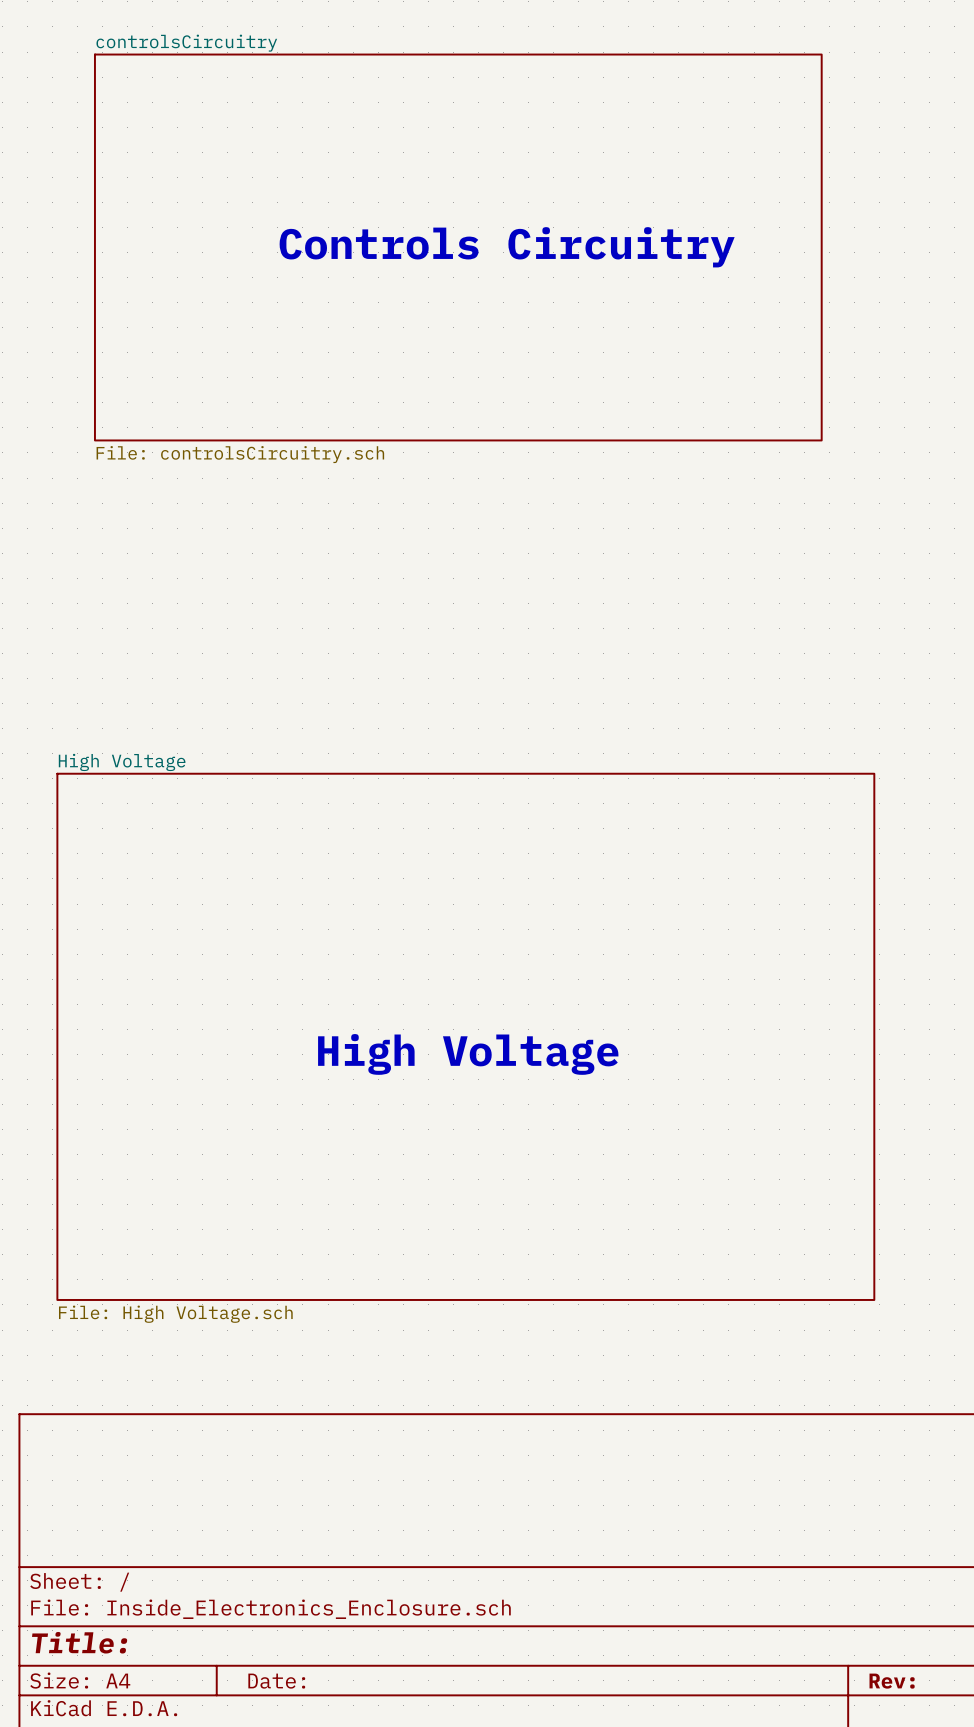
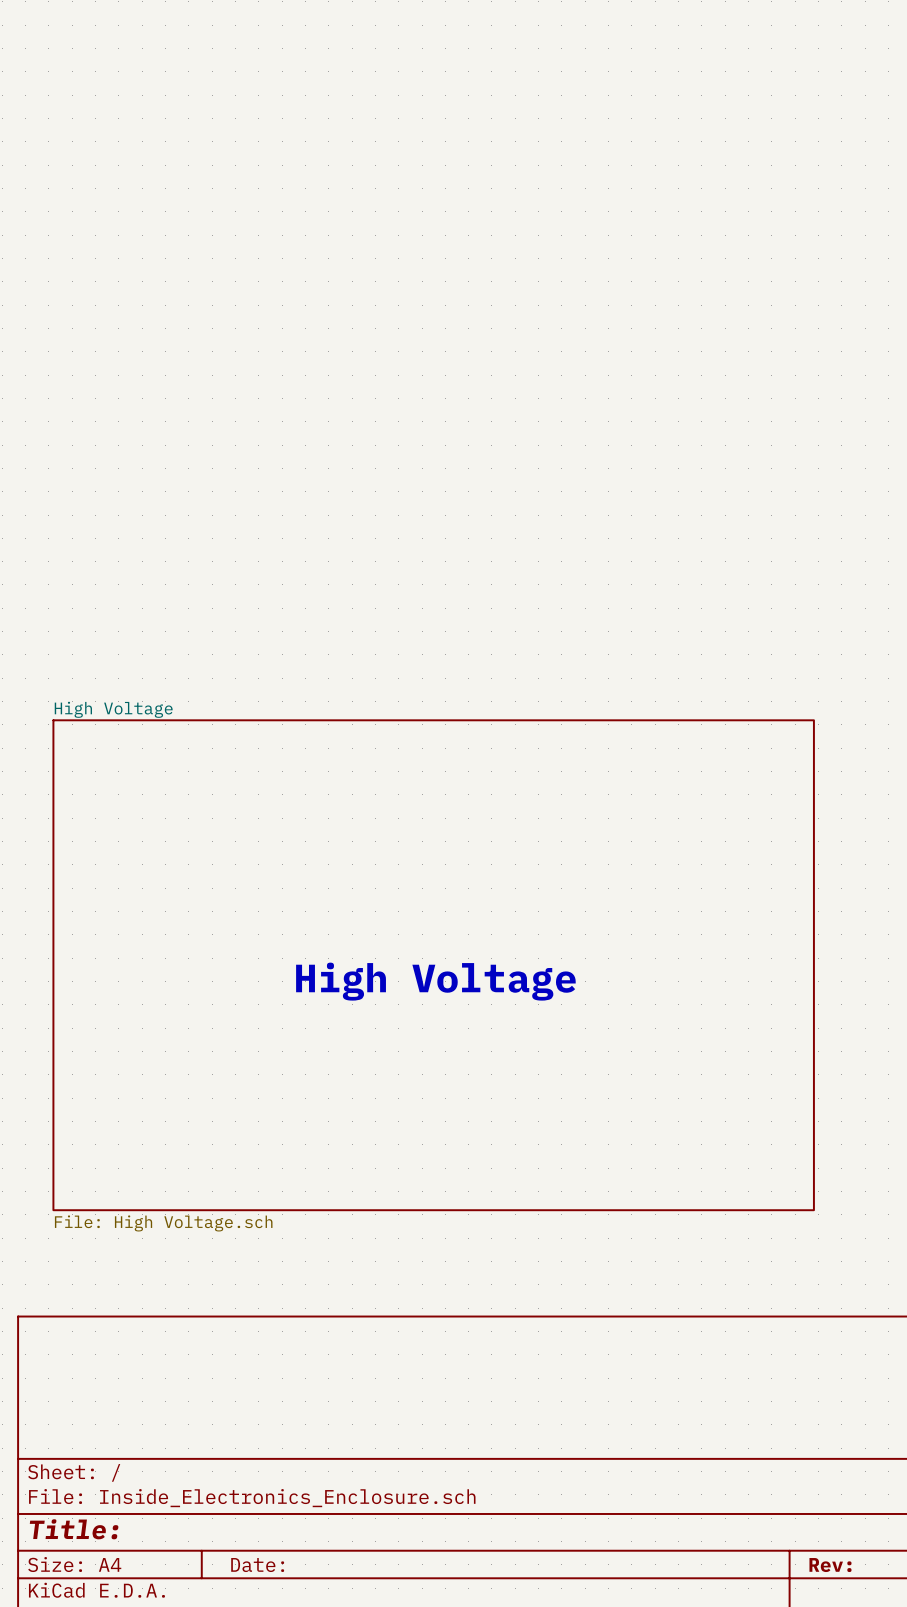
sheet controlsCircuitry: File: controlsCircuitry.sch (458, 247) -> none
text: Controls Circuitry (507, 247) -> none

